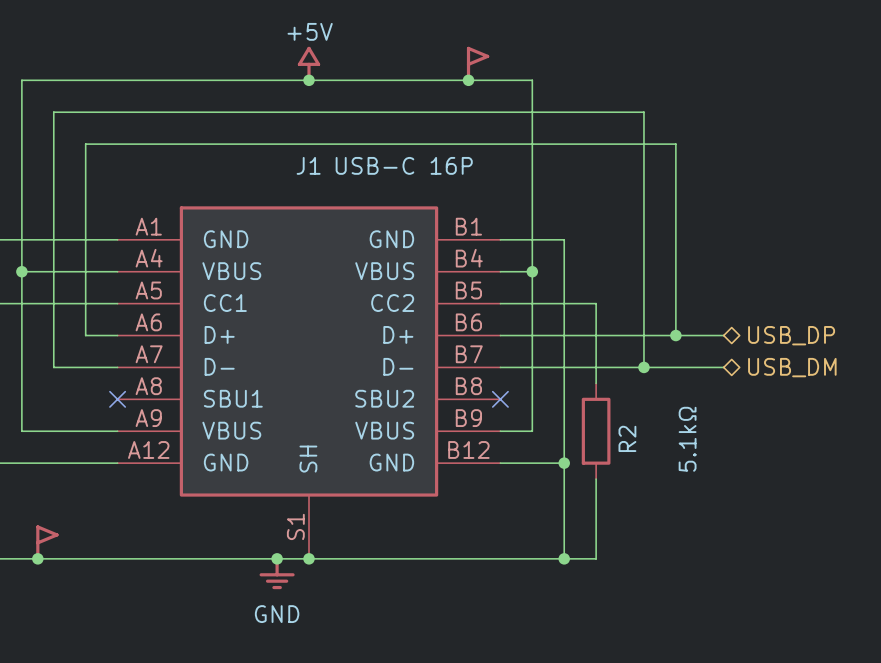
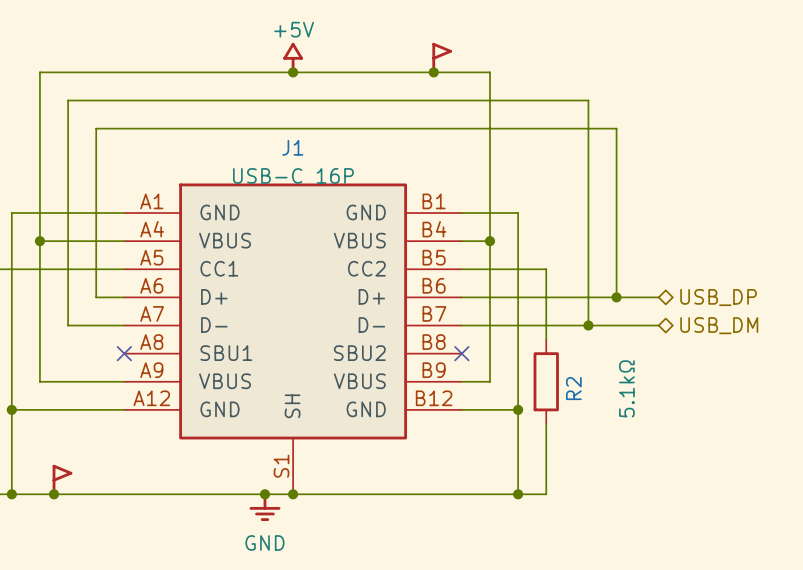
J1 value position: USB-C 16P (404, 165) -> USB-C 16P (293, 175)

